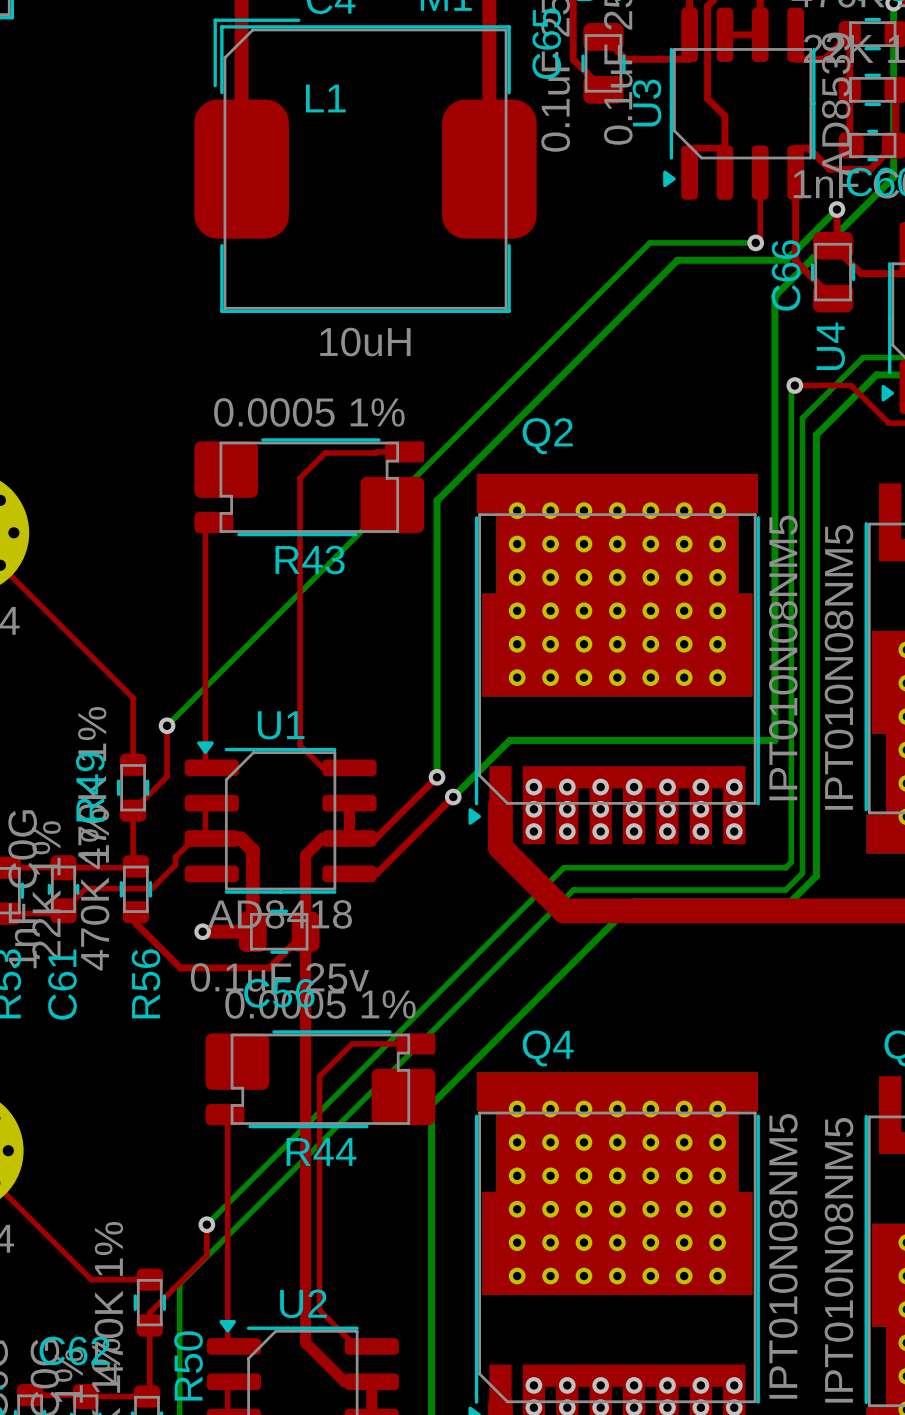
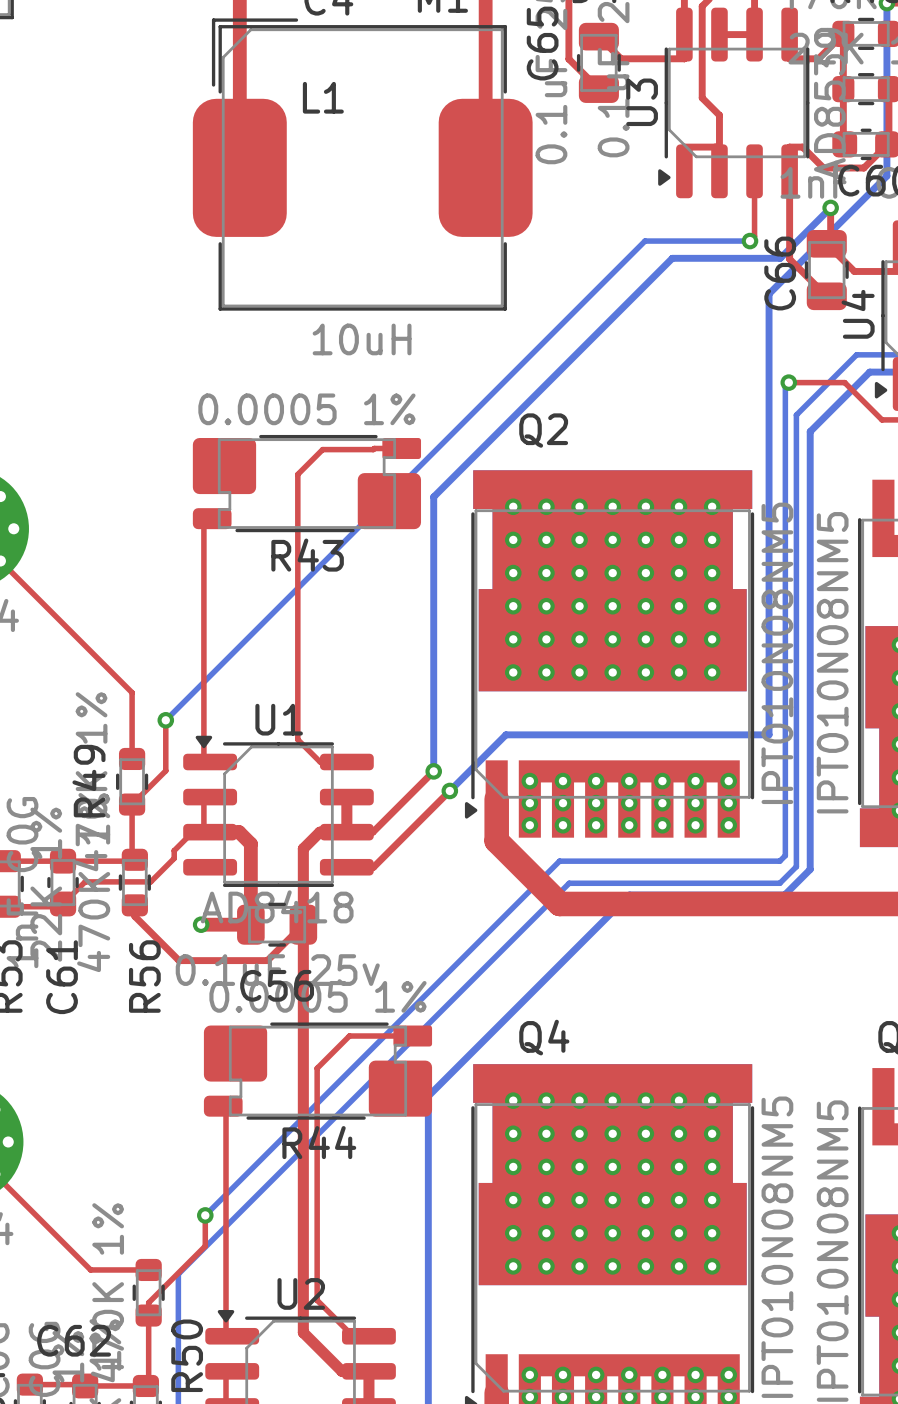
U4 name position: U4 (830, 346) -> U4 (858, 314)

